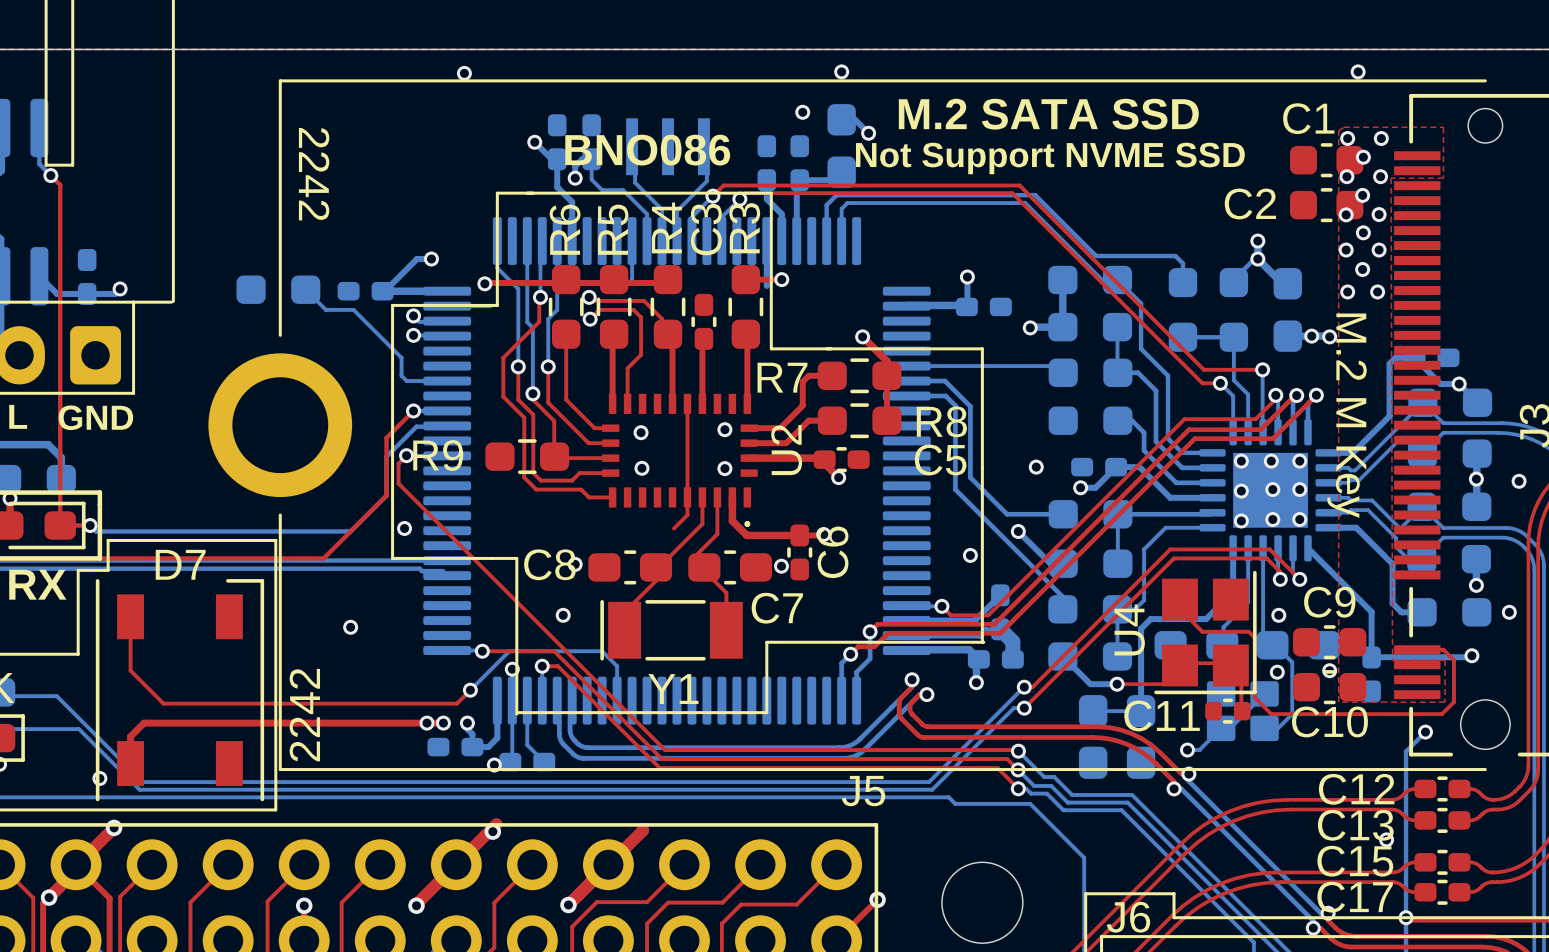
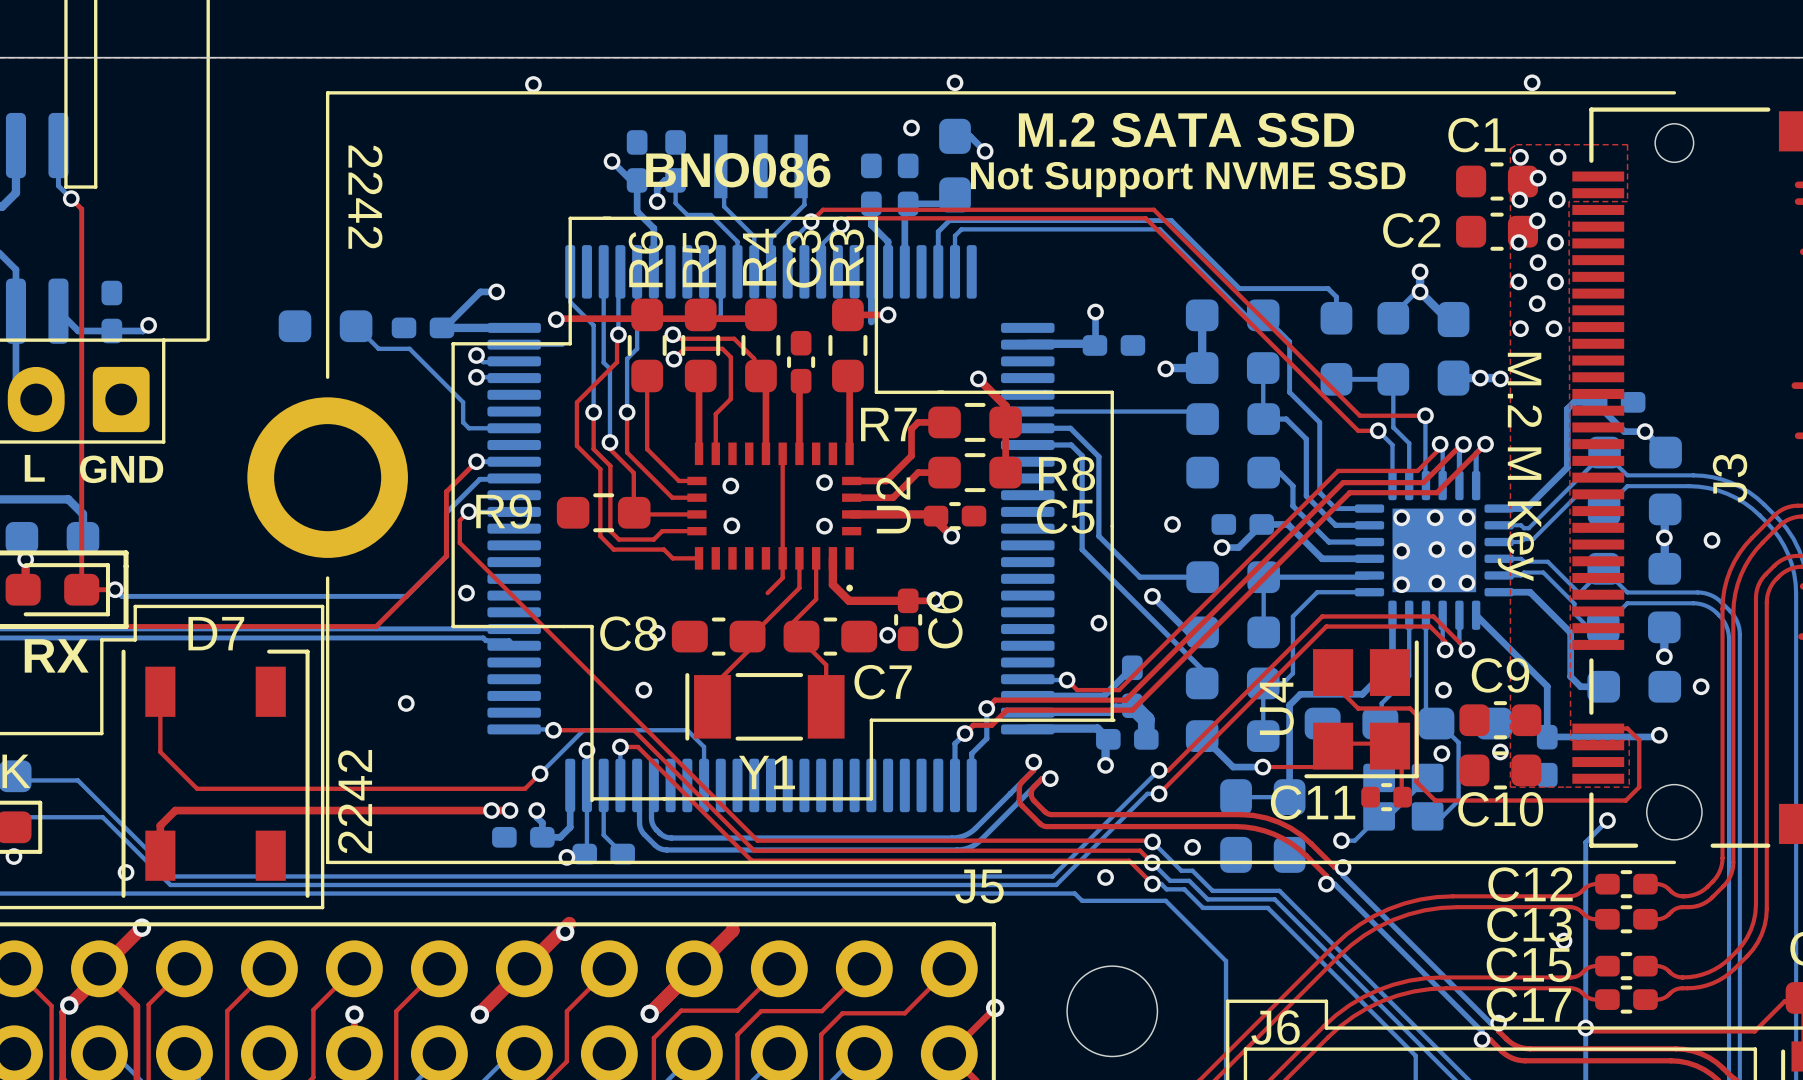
via: none -> (1192, 847)
via: none -> (1105, 877)

